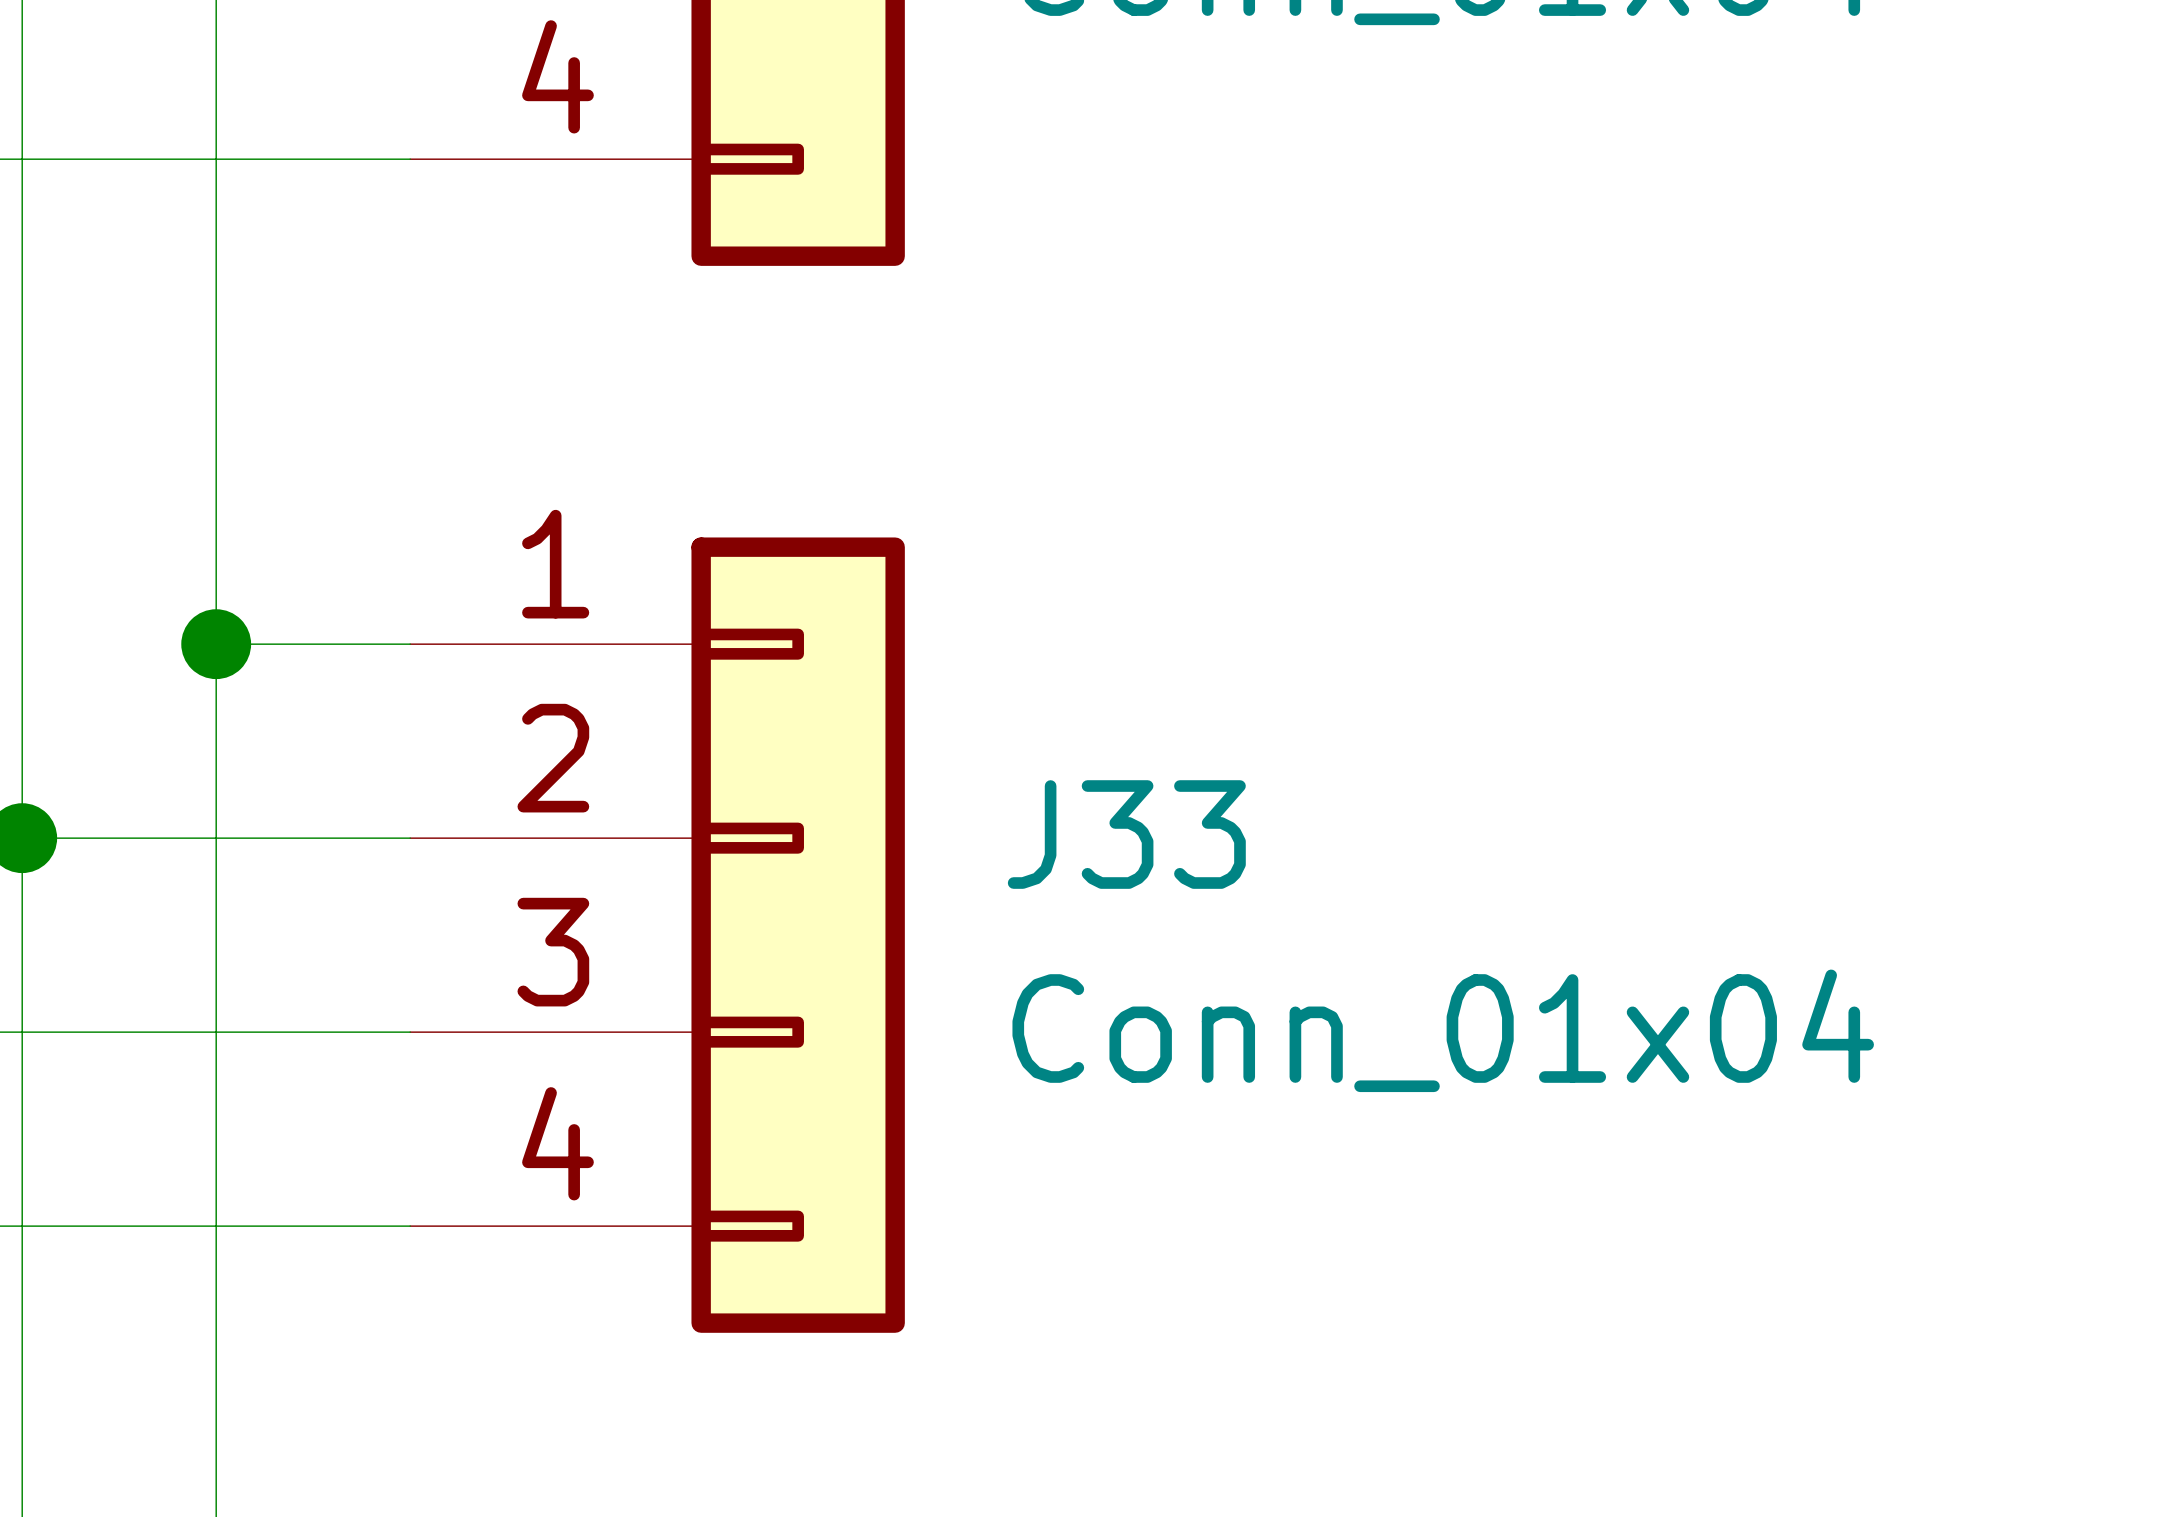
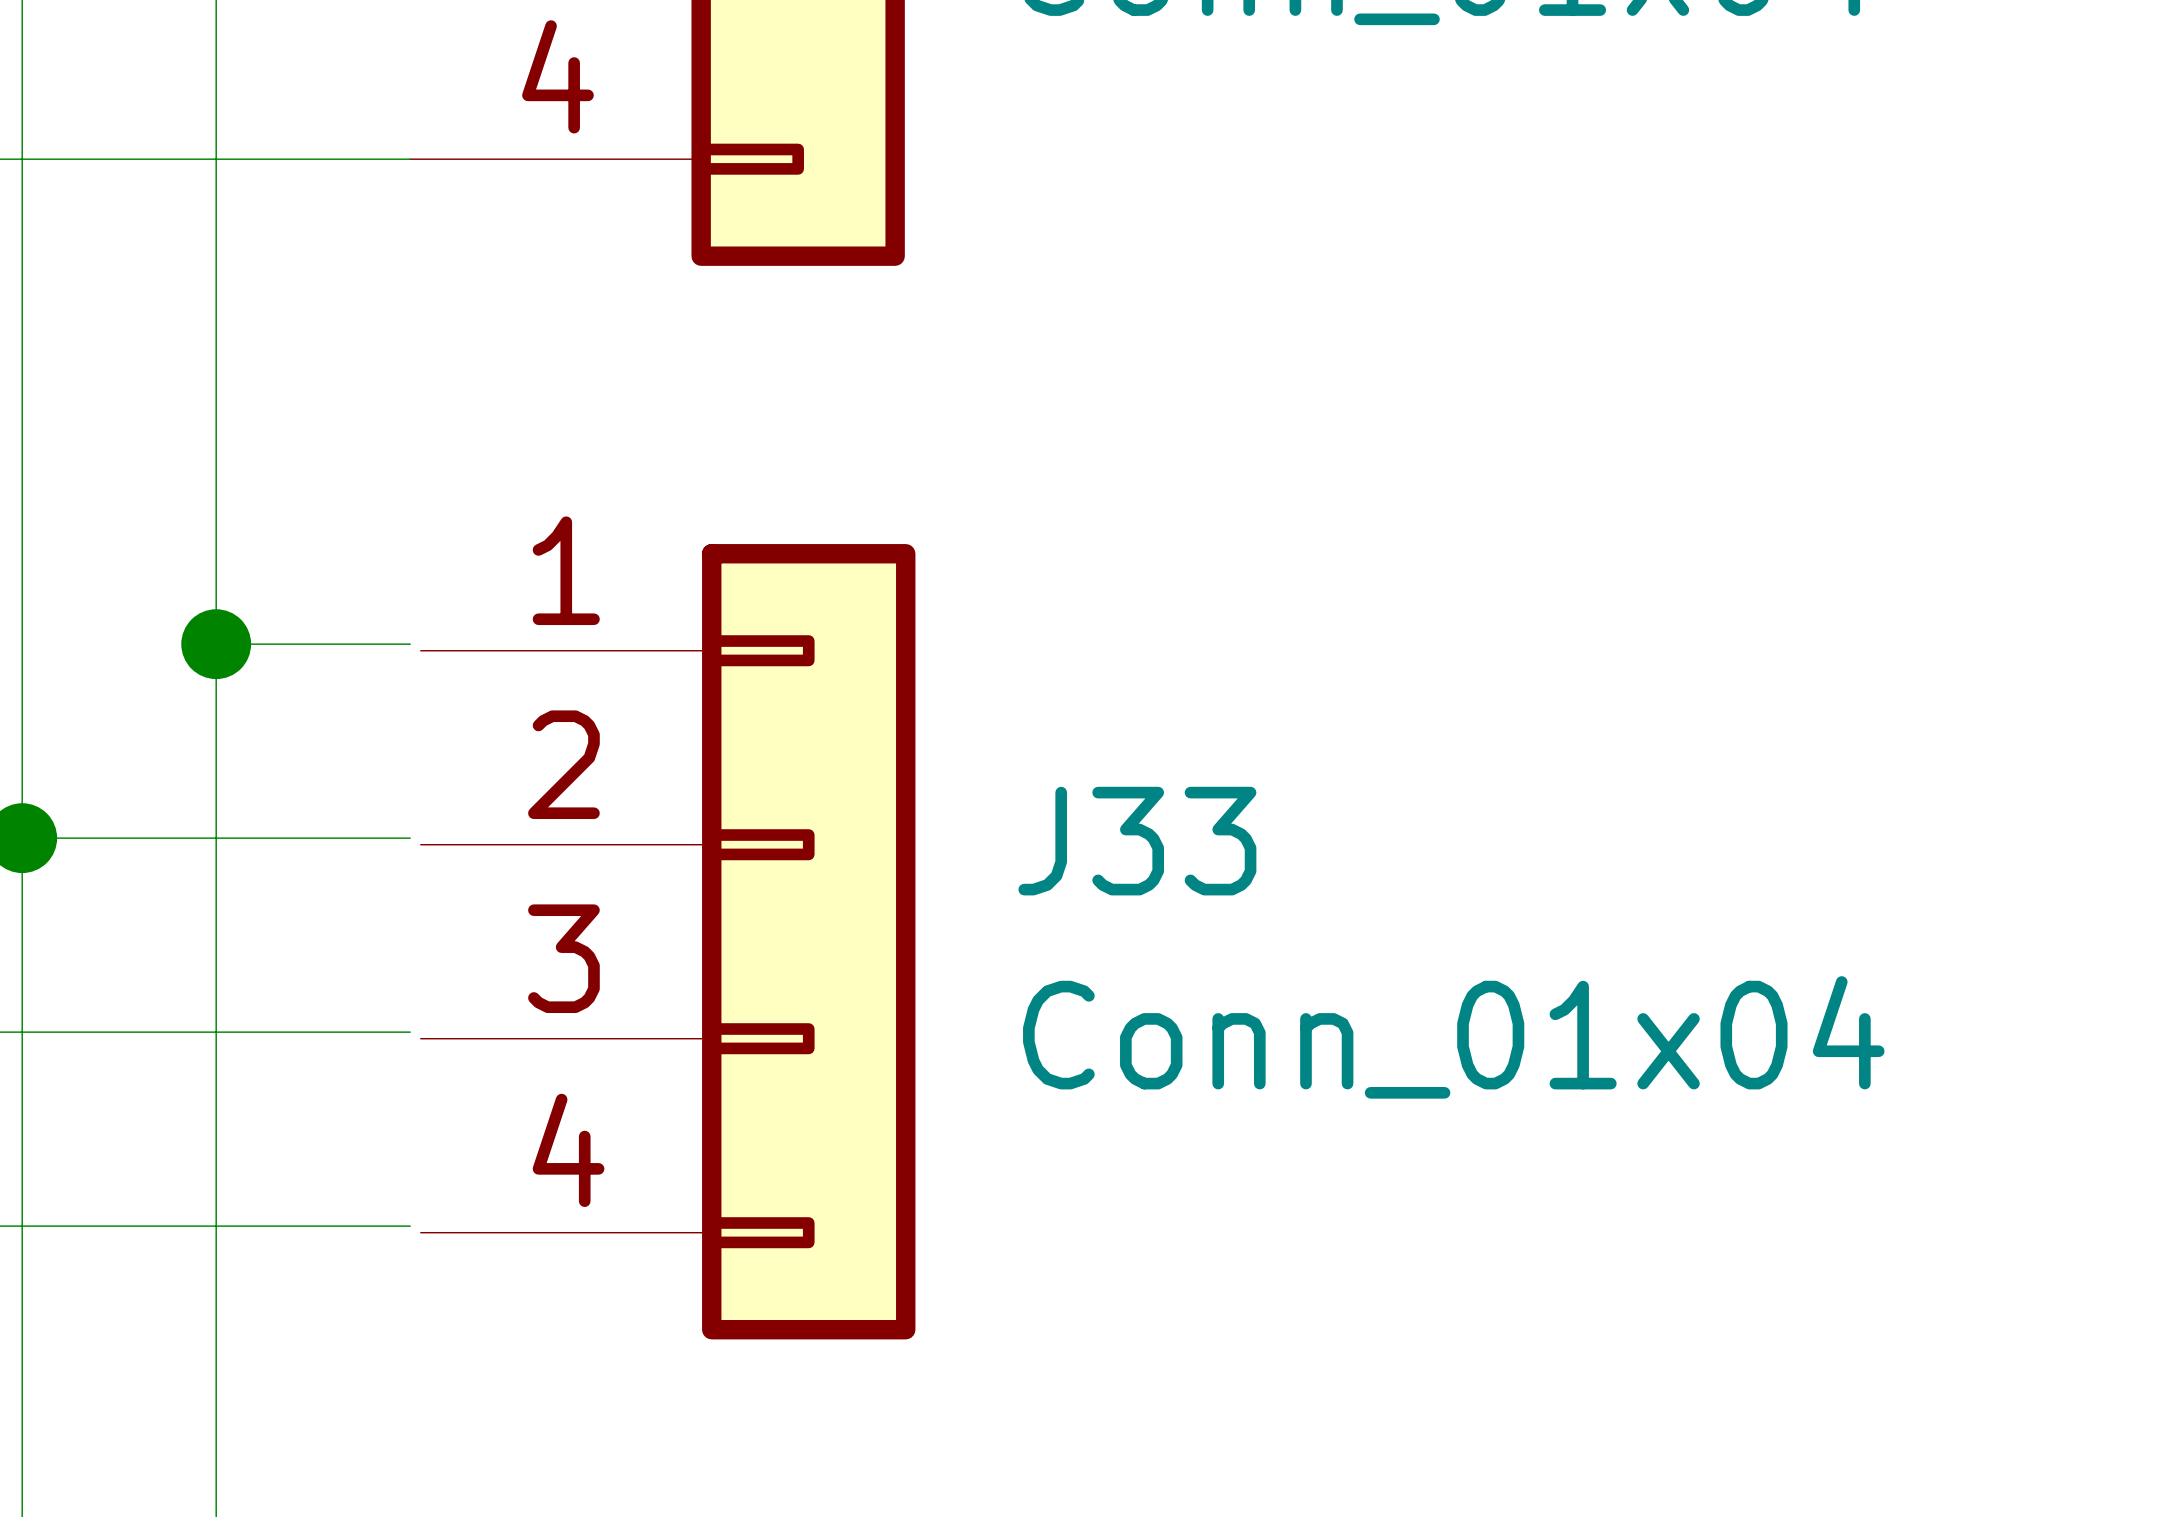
J33 position: (657, 935) -> (668, 941)

